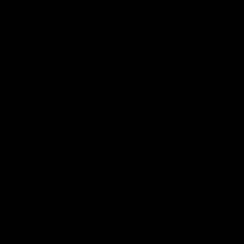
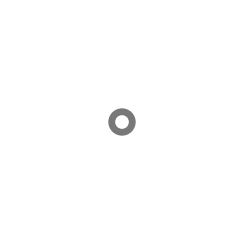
via: none -> (122, 122)

